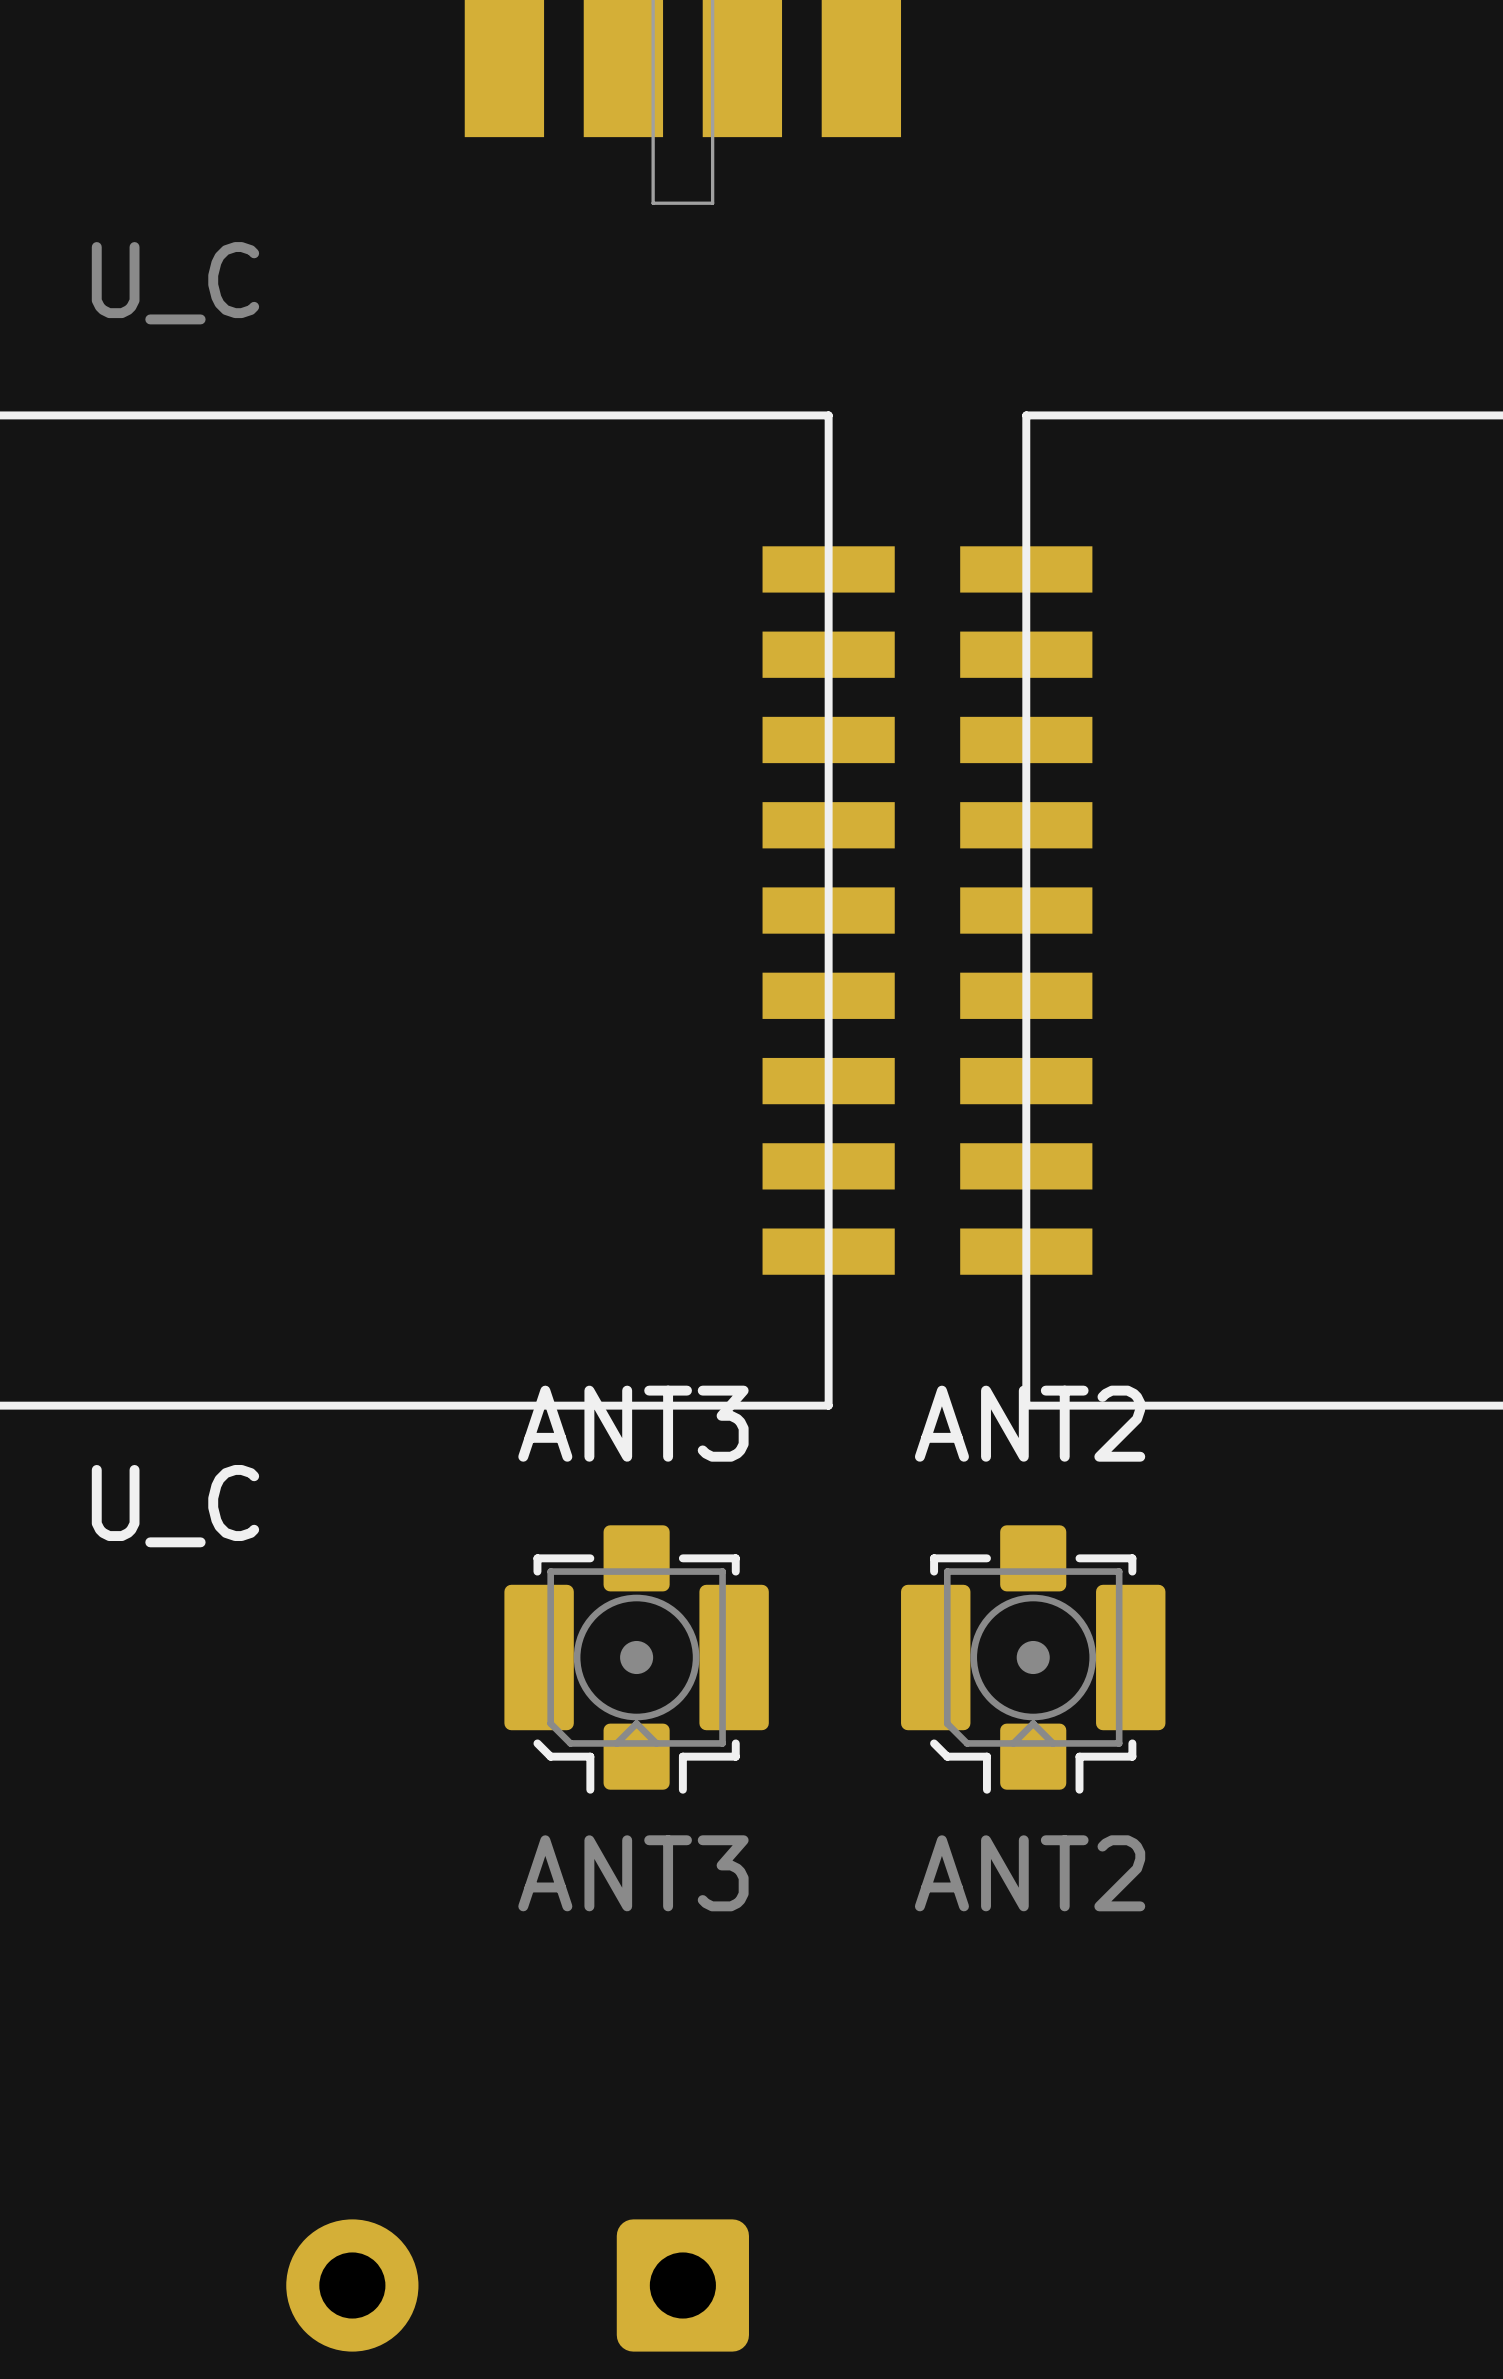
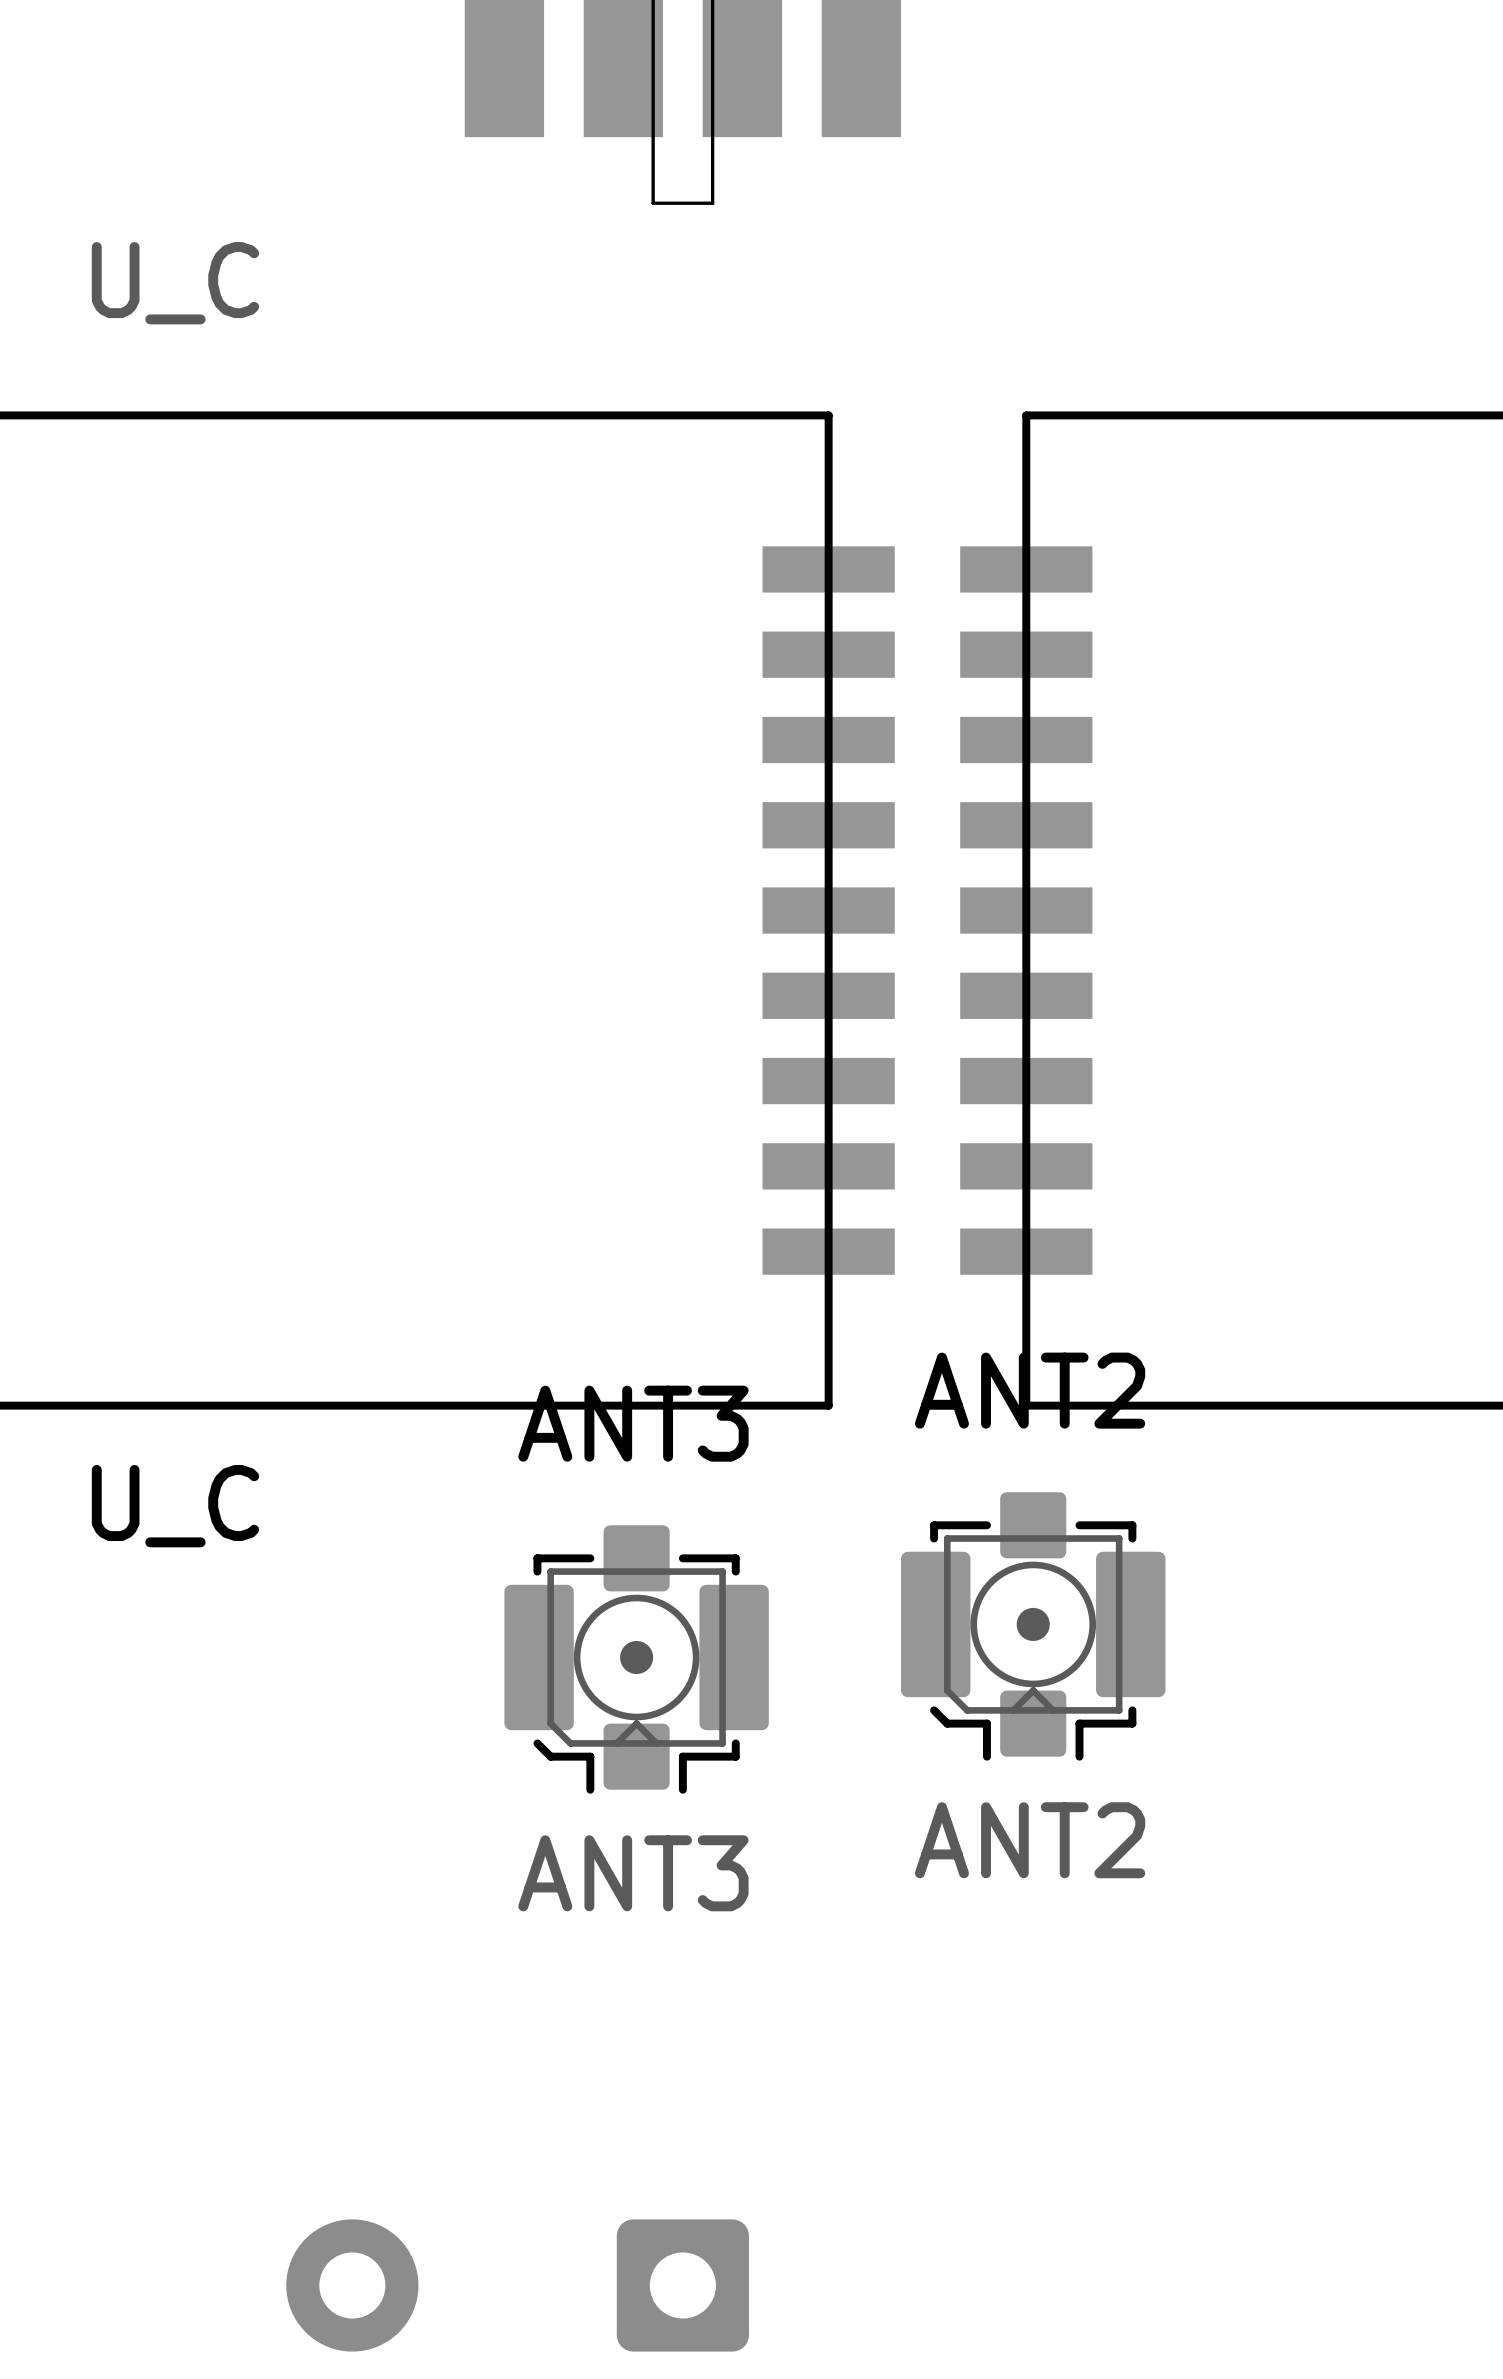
ANT2 position: (1033, 1659) -> (1033, 1626)

